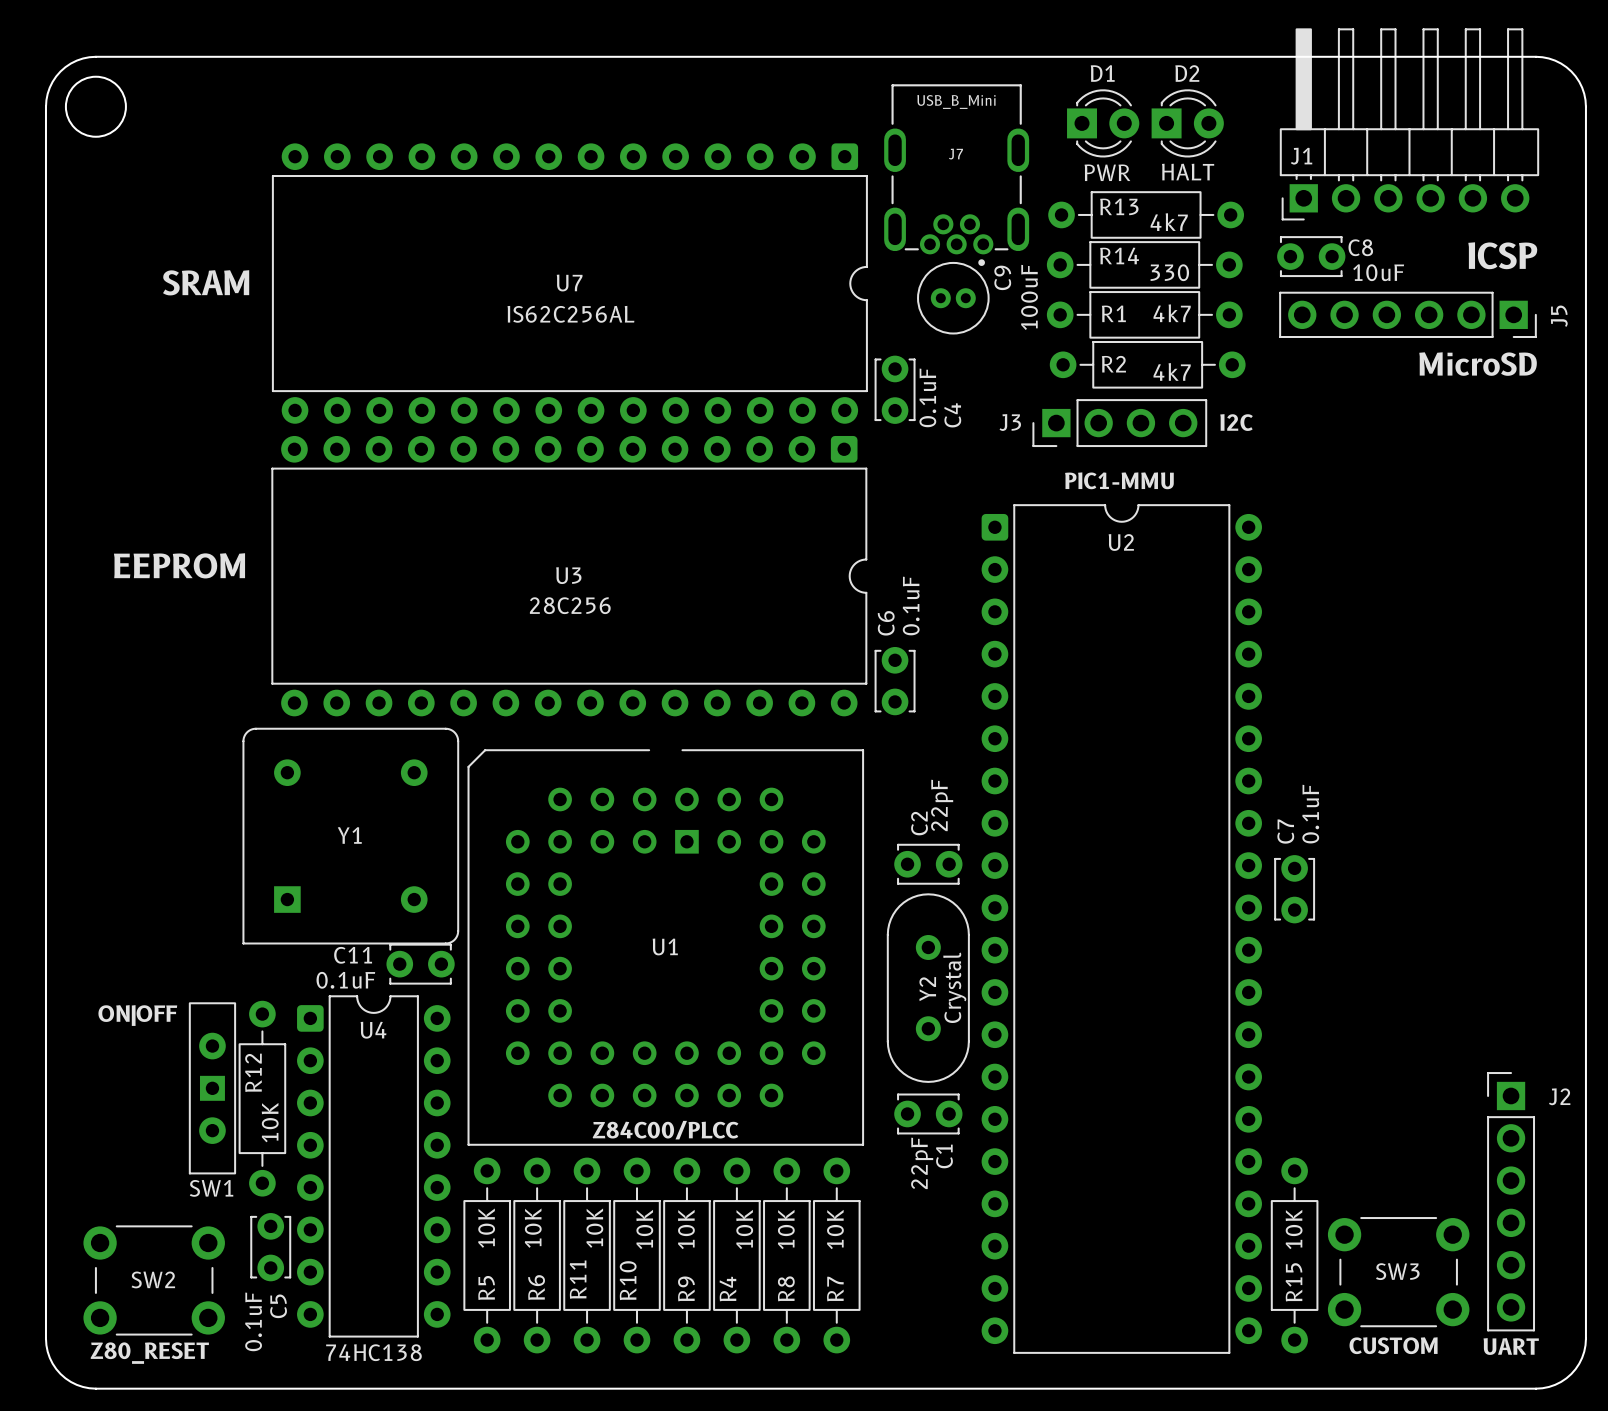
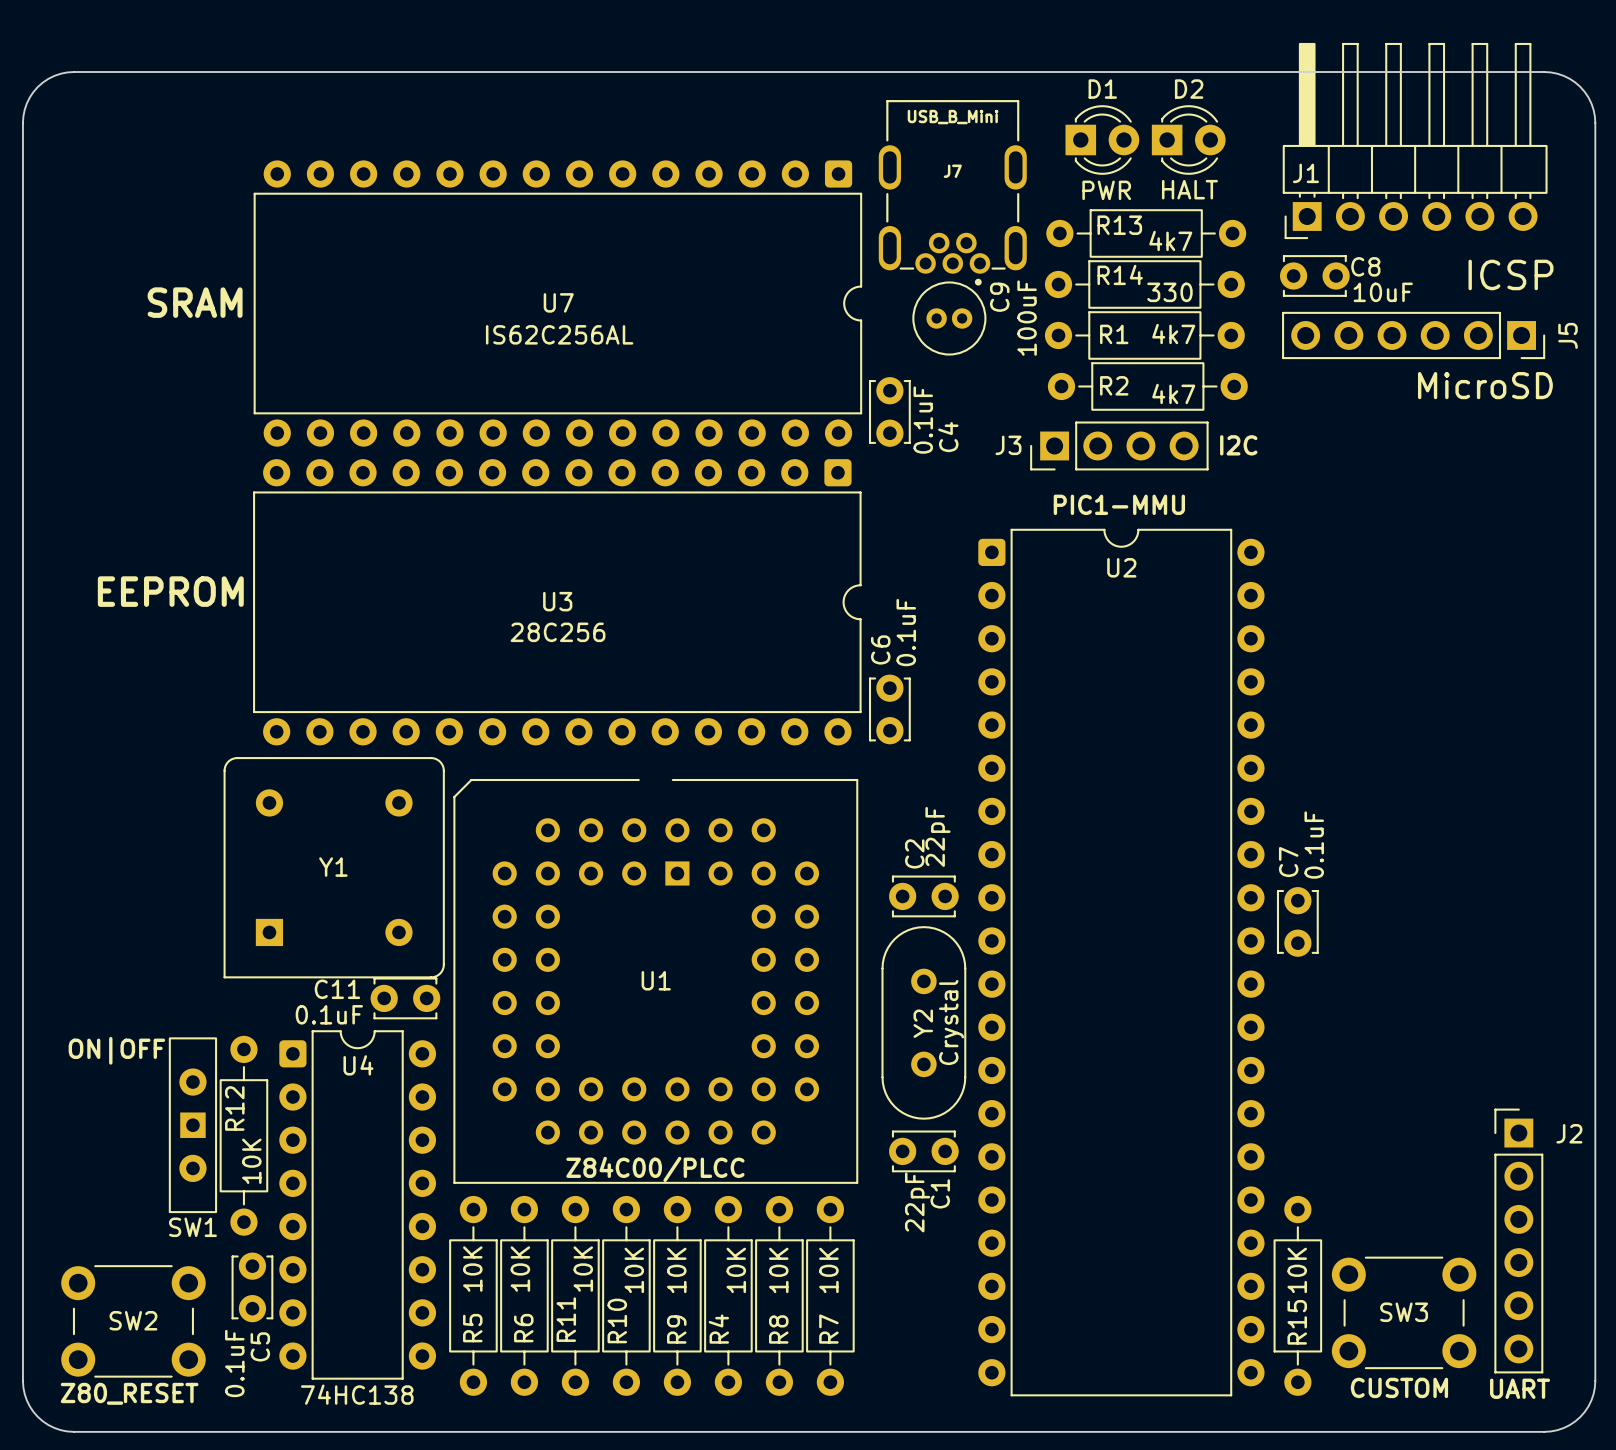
round board edge: [65, 76, 127, 138] -> none

